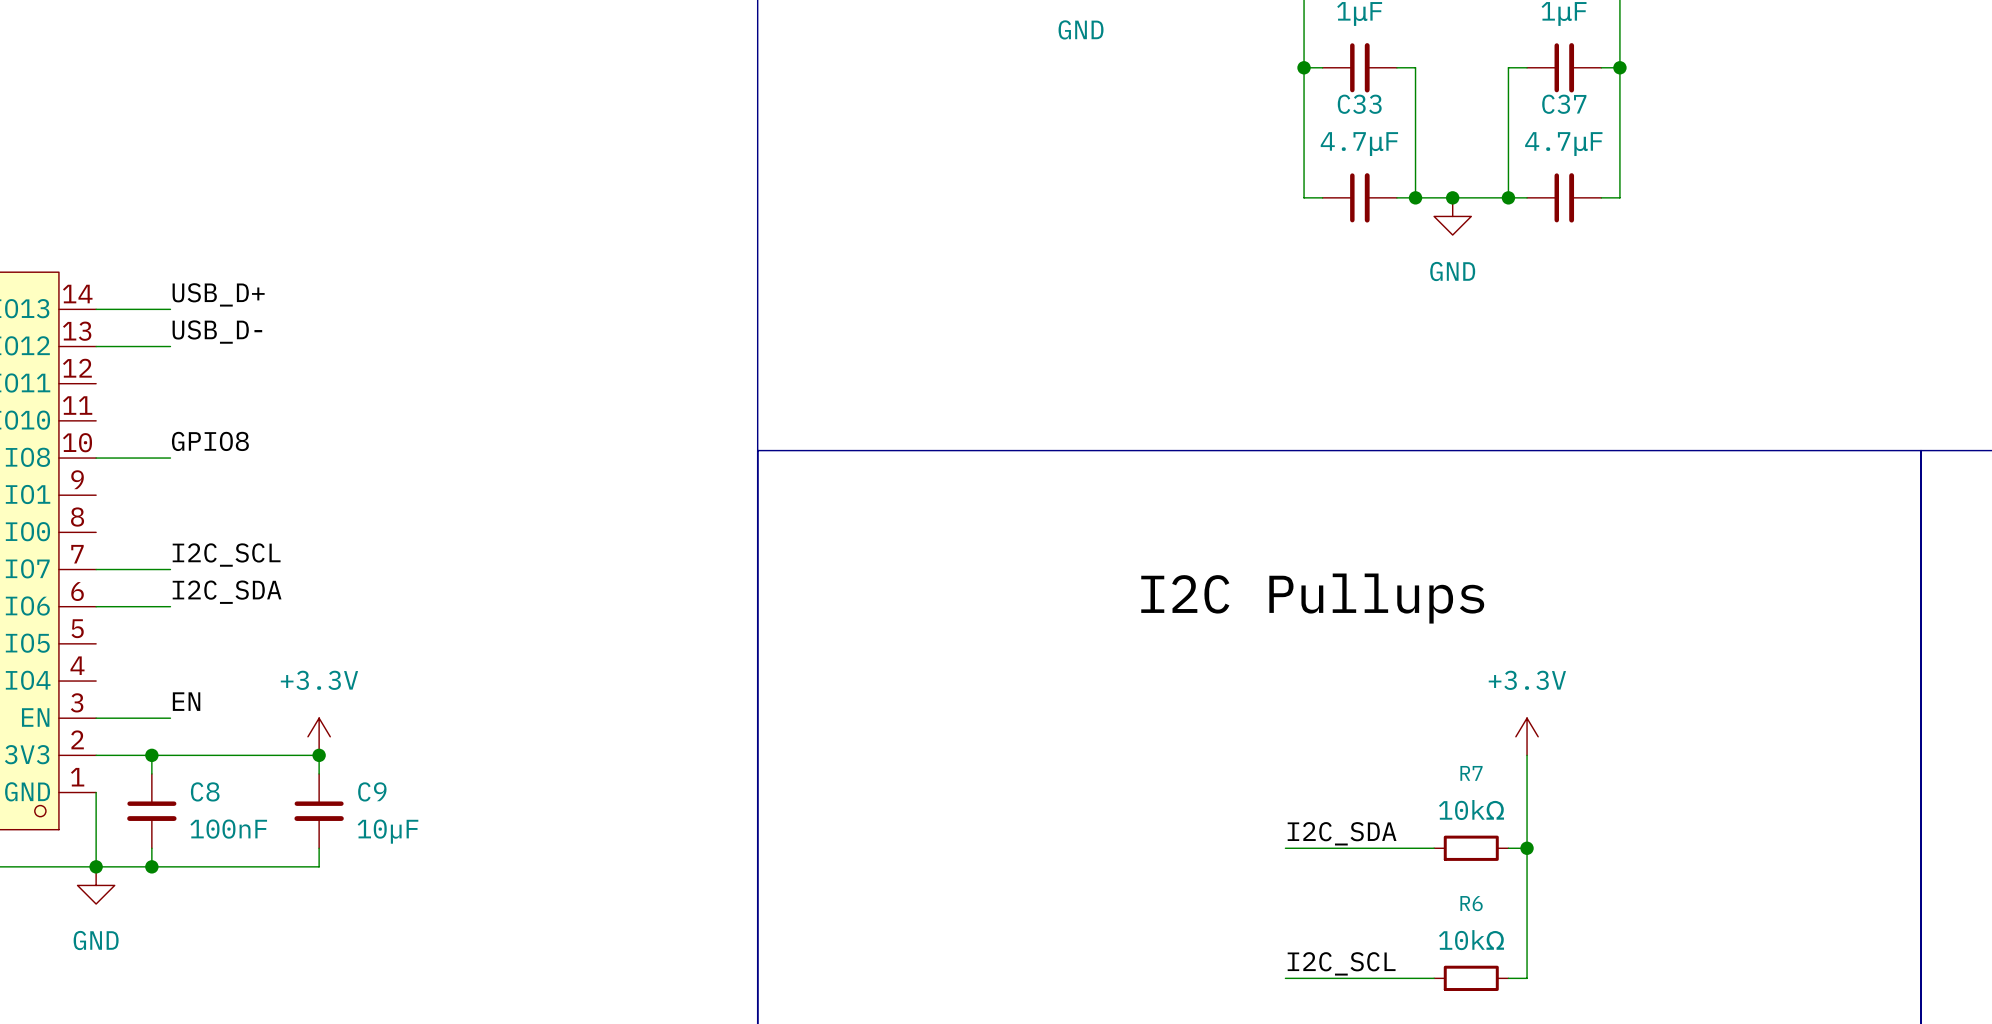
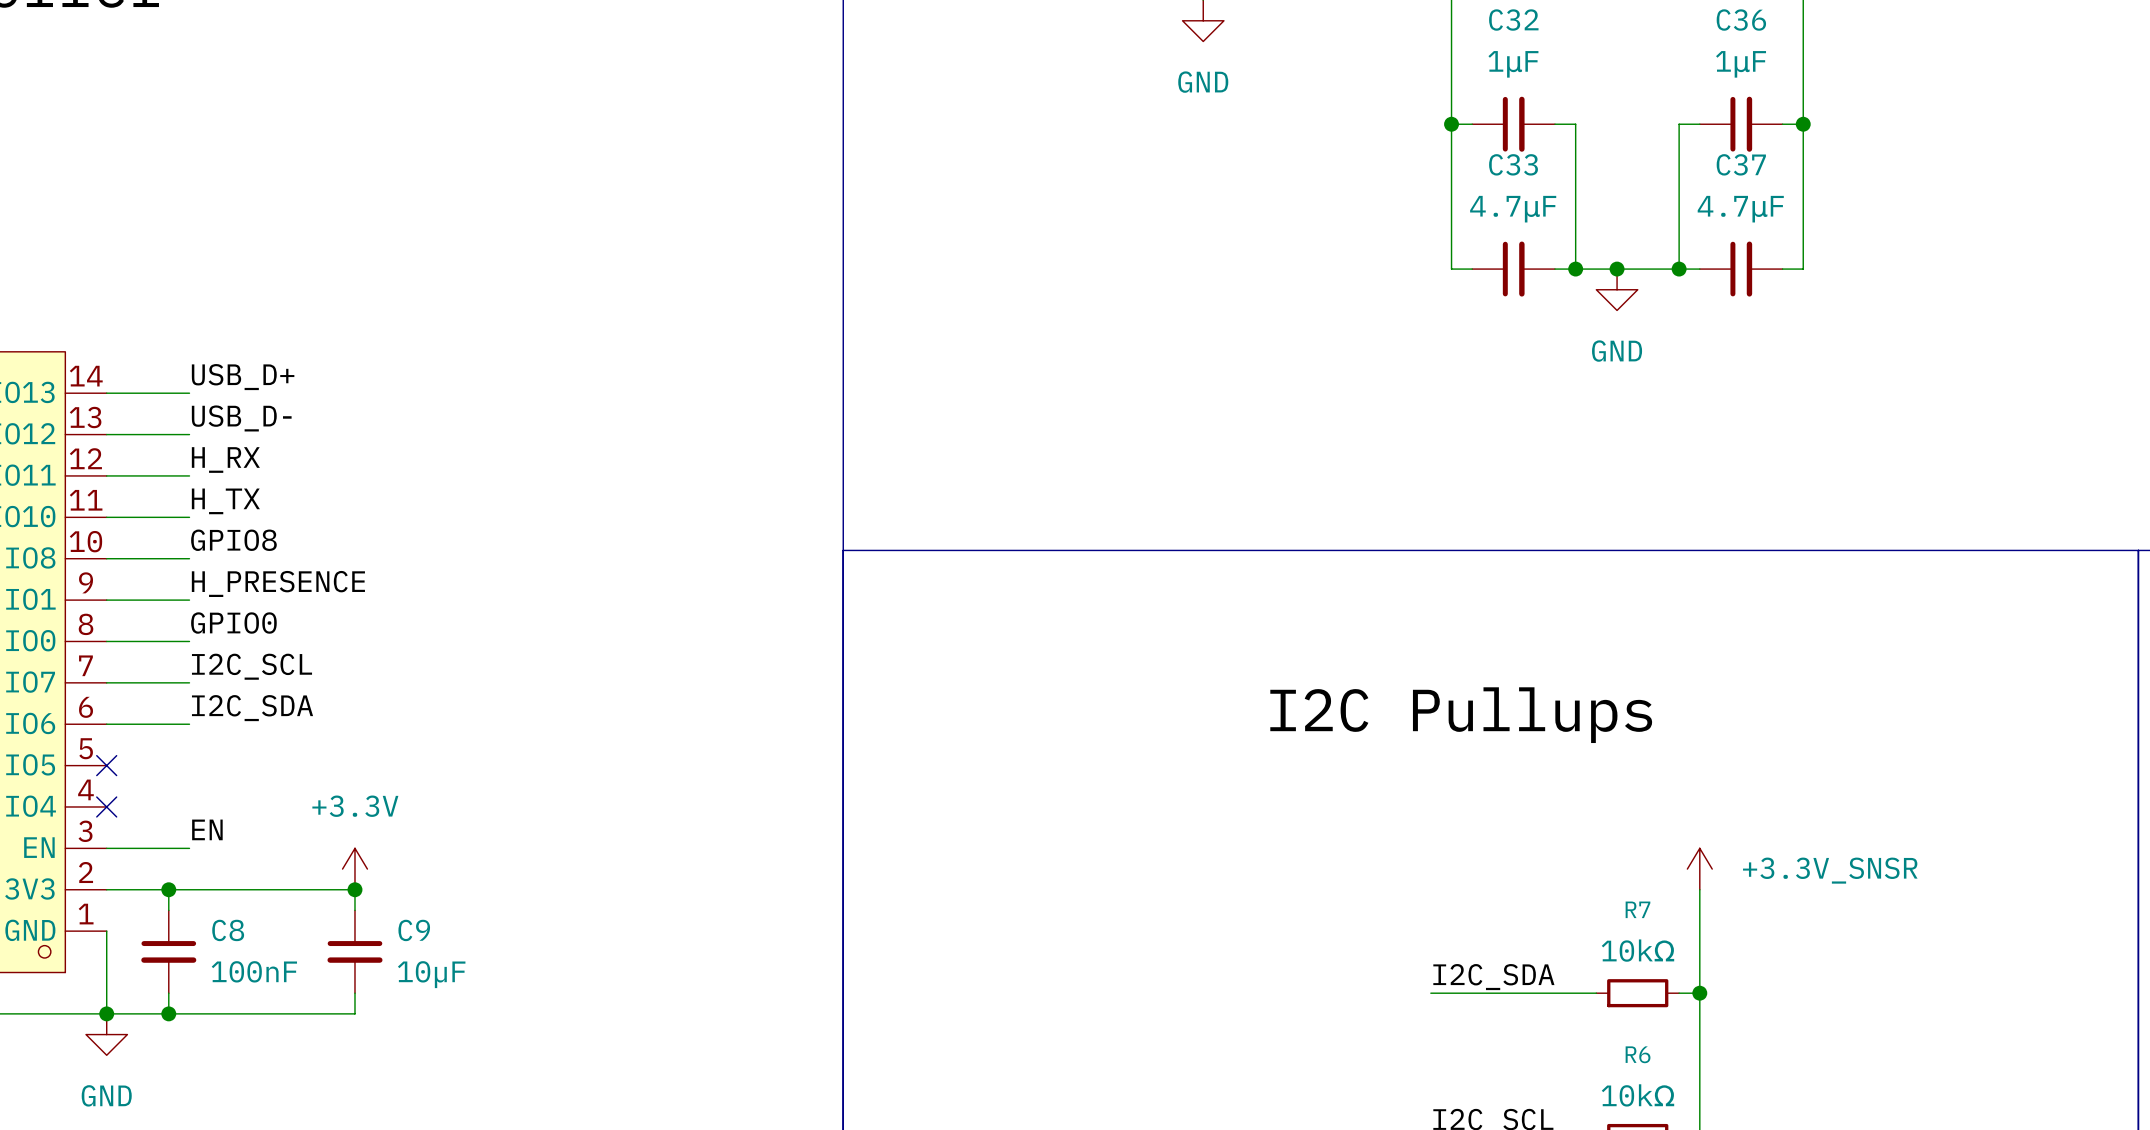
label: none -> H_RX (225, 460)
wire: none -> (106, 475) (189, 475)
label: none -> H_TX (225, 501)
wire: none -> (106, 517) (189, 517)
label: none -> H_PRESENCE (278, 583)
wire: none -> (106, 600) (189, 600)
label: none -> GPIO0 (233, 623)
wire: none -> (106, 641) (189, 641)
no-connect mark: none -> (106, 765)
no-connect mark: none -> (106, 806)
power symbol: +3.3V (1527, 736) -> +3.3V_SNSR (1699, 869)

